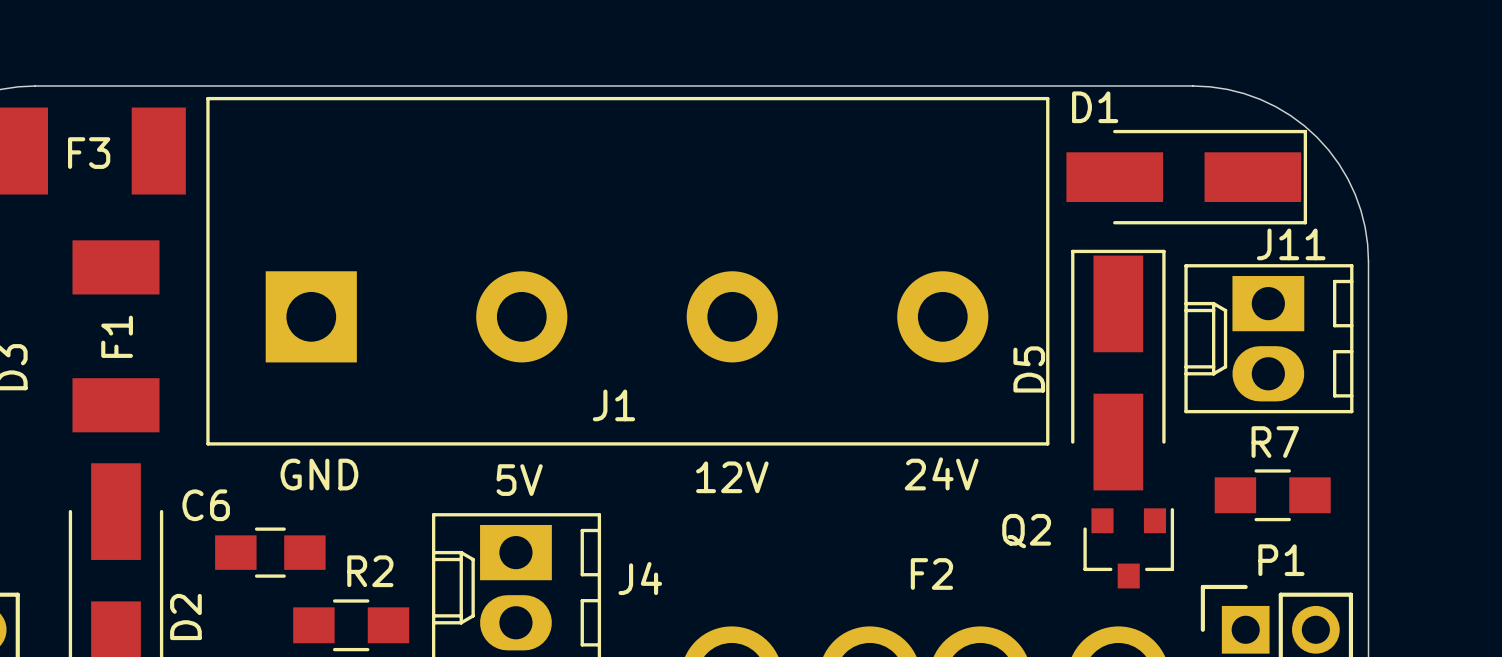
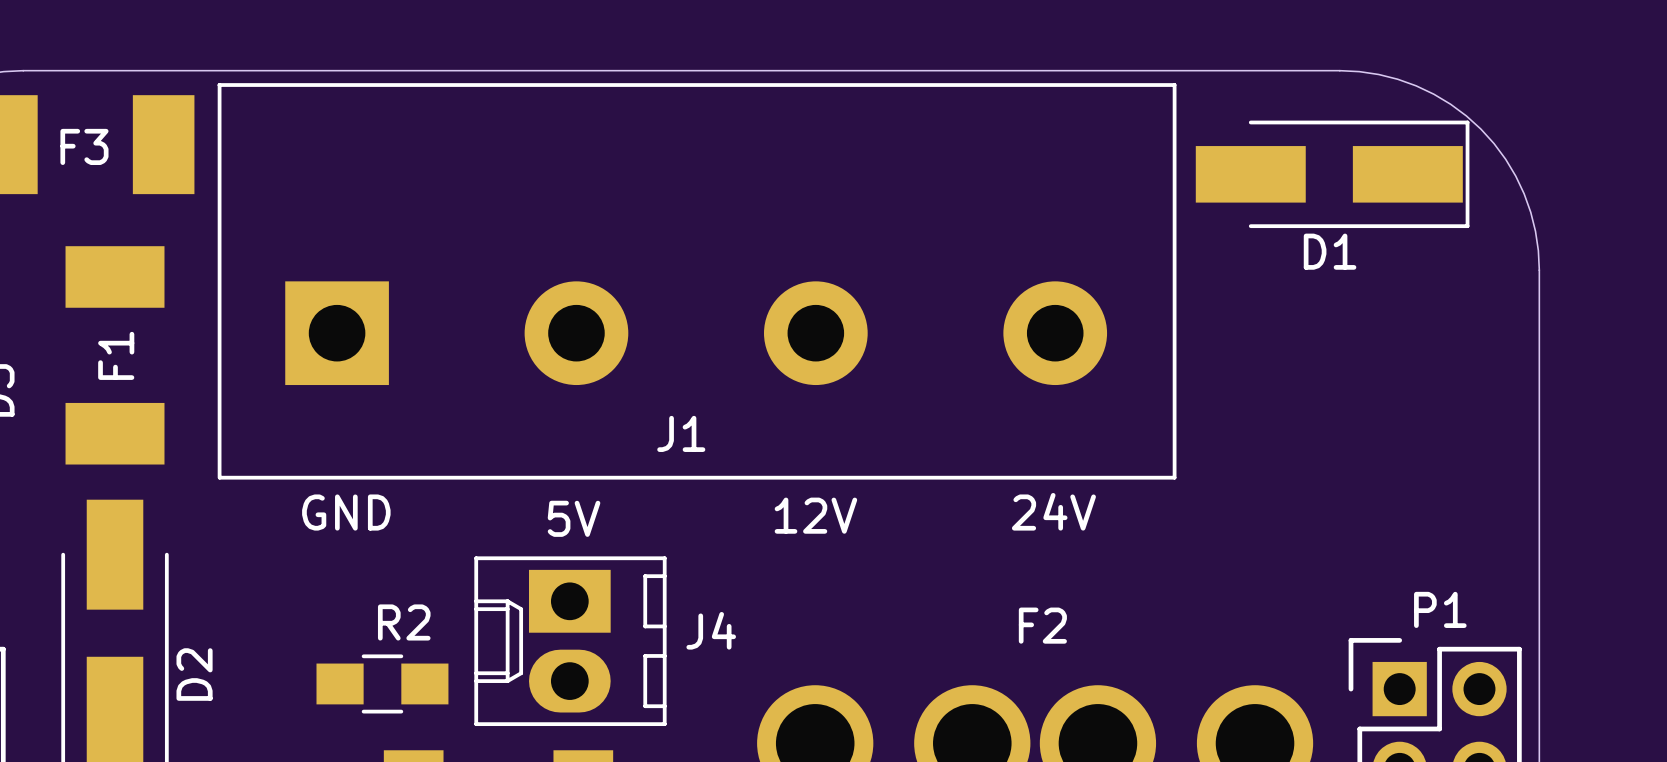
D1 name position: D1 (1095, 107) -> D1 (1330, 251)
J11: (1268, 338) -> none
D5: (1118, 370) -> none
R7: (1272, 495) -> none
Q2: (1128, 548) -> none
C6: (270, 552) -> none

